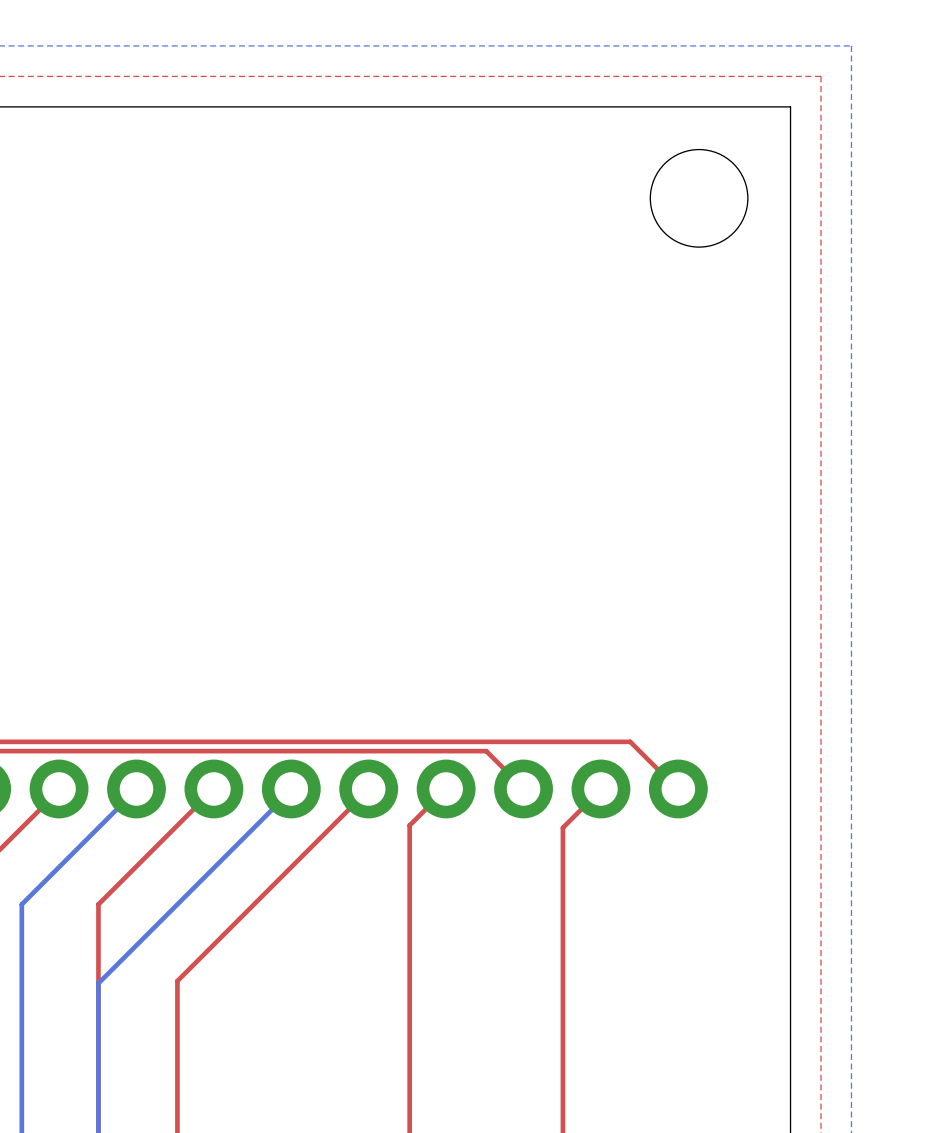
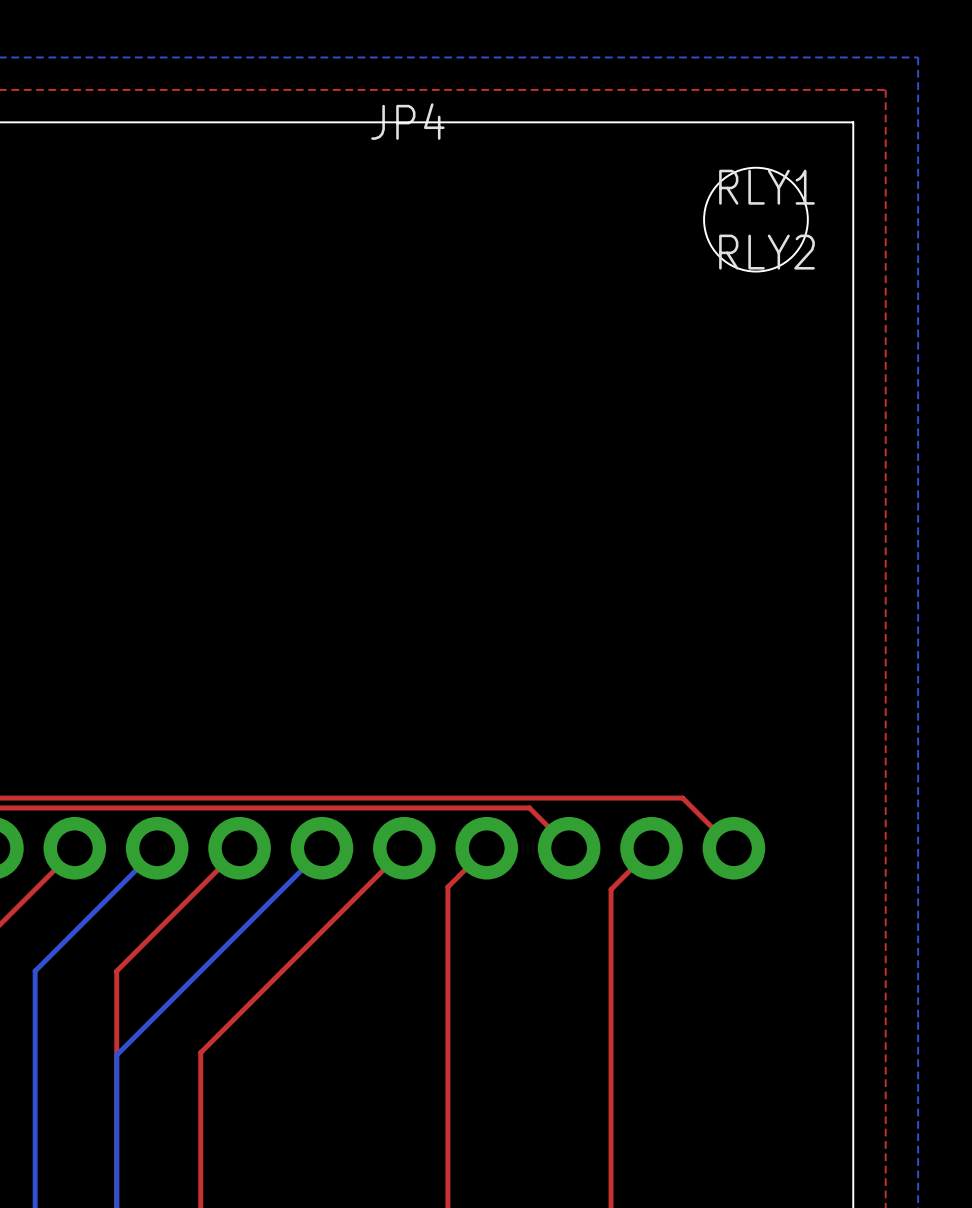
text: none -> JP4 (407, 121)
text: none -> RLY1 (766, 187)
text: none -> RLY2 (766, 252)

